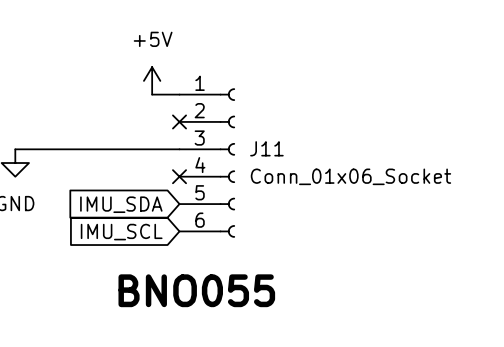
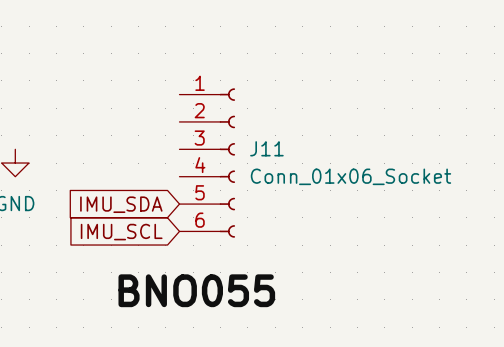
power symbol: +5V (152, 80) -> none
wire: (152, 94) (179, 94) -> none
no-connect mark: (179, 121) -> none
wire: (15, 149) (179, 149) -> none
no-connect mark: (179, 176) -> none

